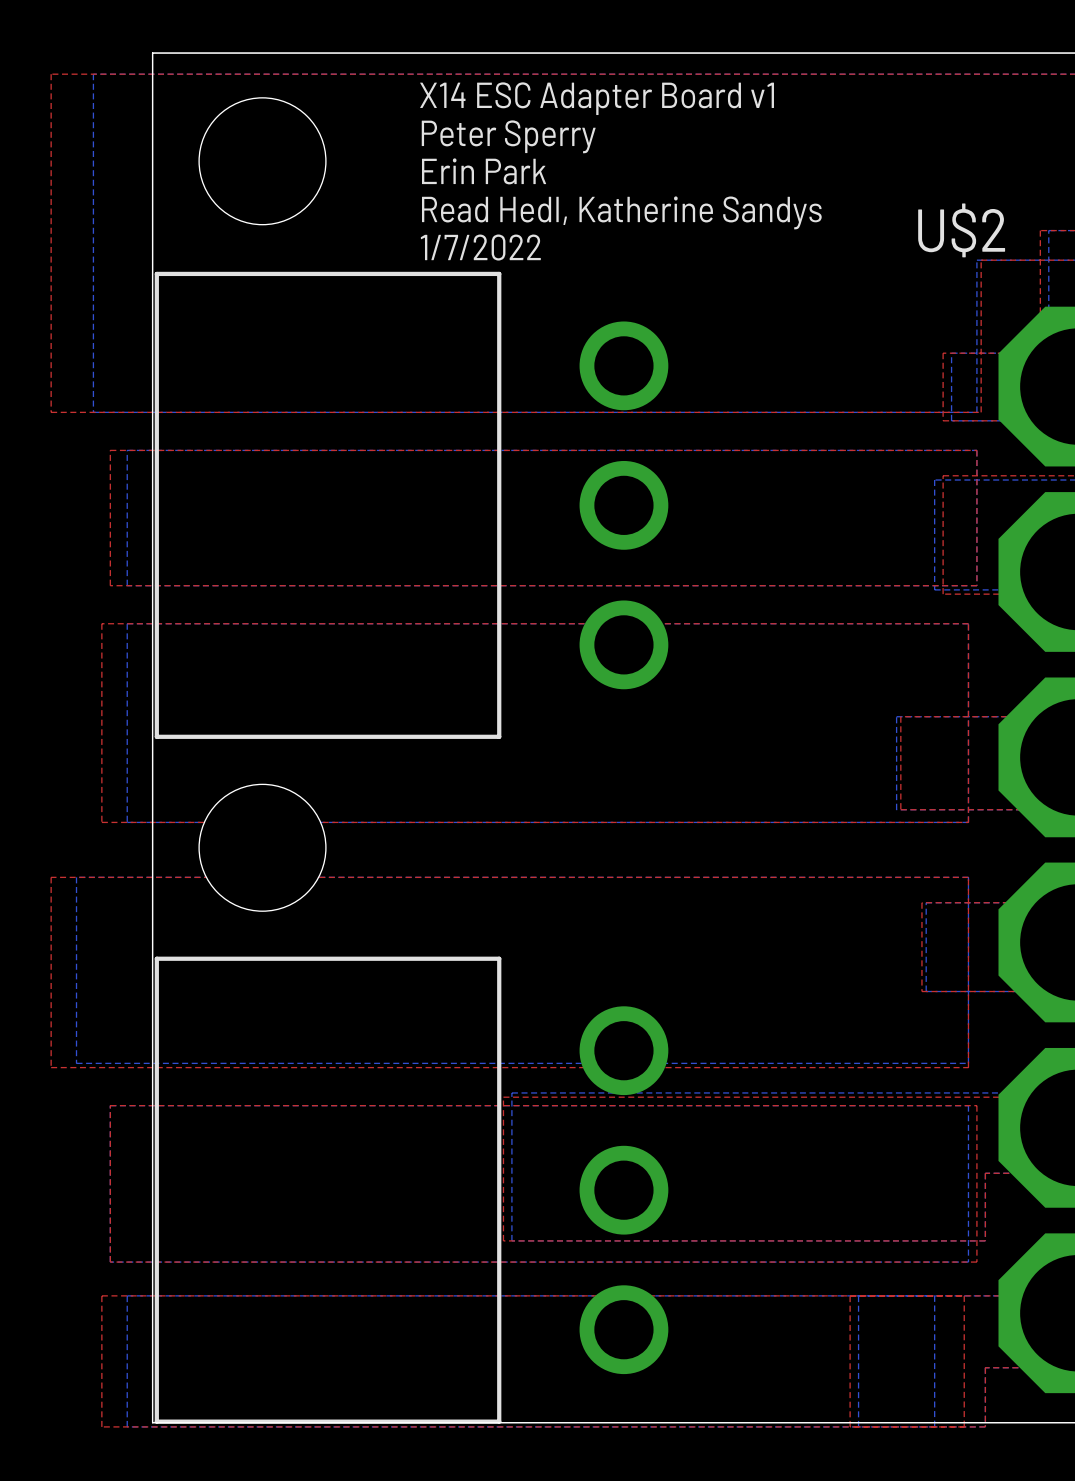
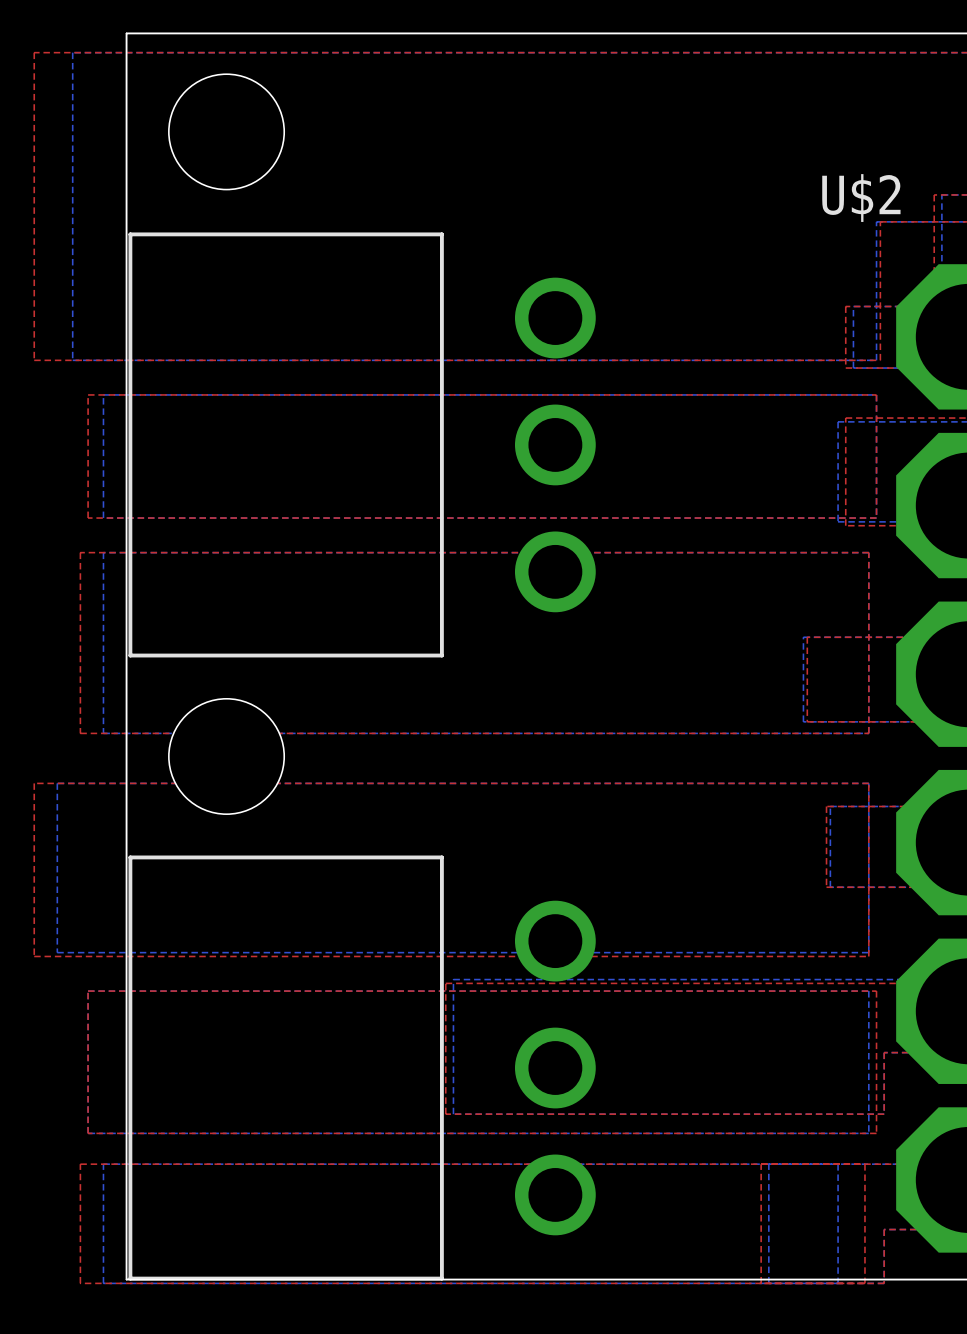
text: X14 ESC Adapter Board v1 (597, 98) -> none
text: Peter Sperry (508, 136) -> none
text: Erin Park (484, 171) -> none
text: Read Hedl, Katherine Sandys (621, 212) -> none
text: 1/7/2022 (480, 247) -> none

